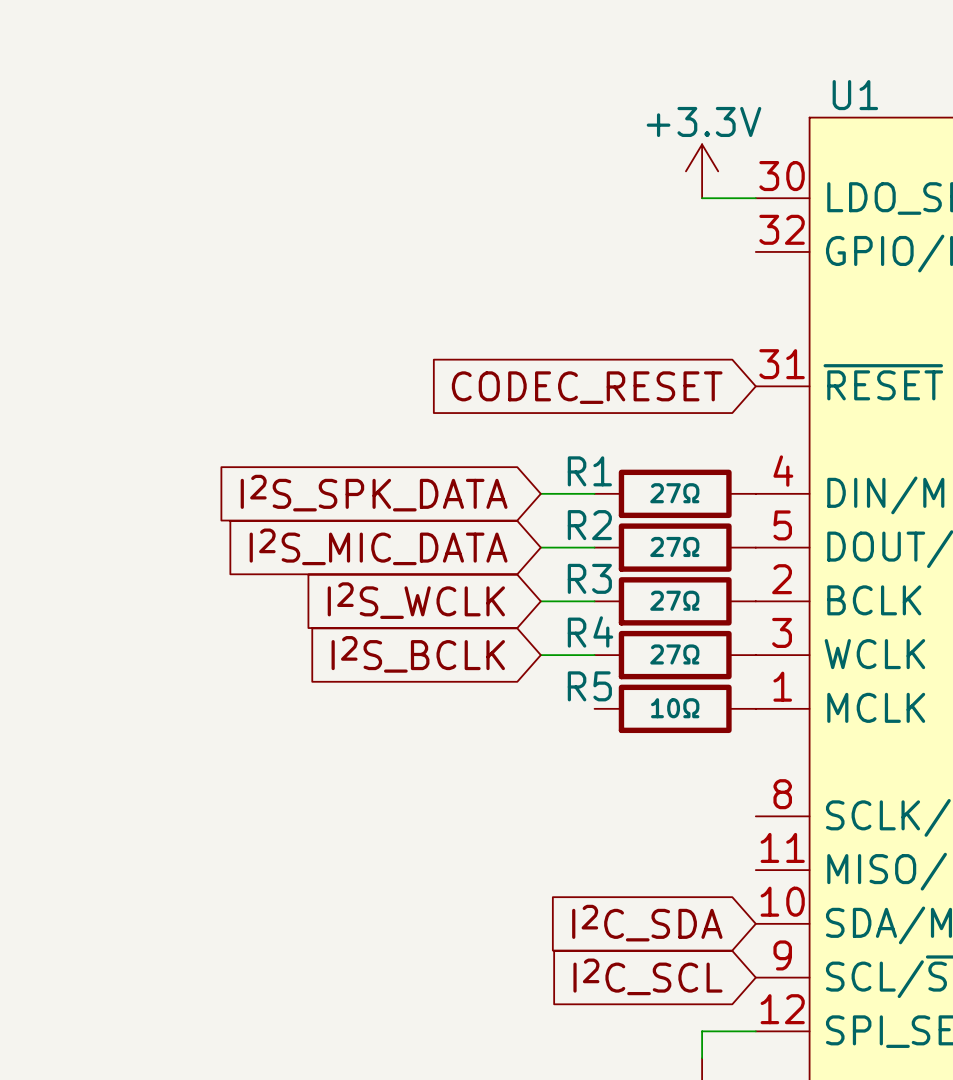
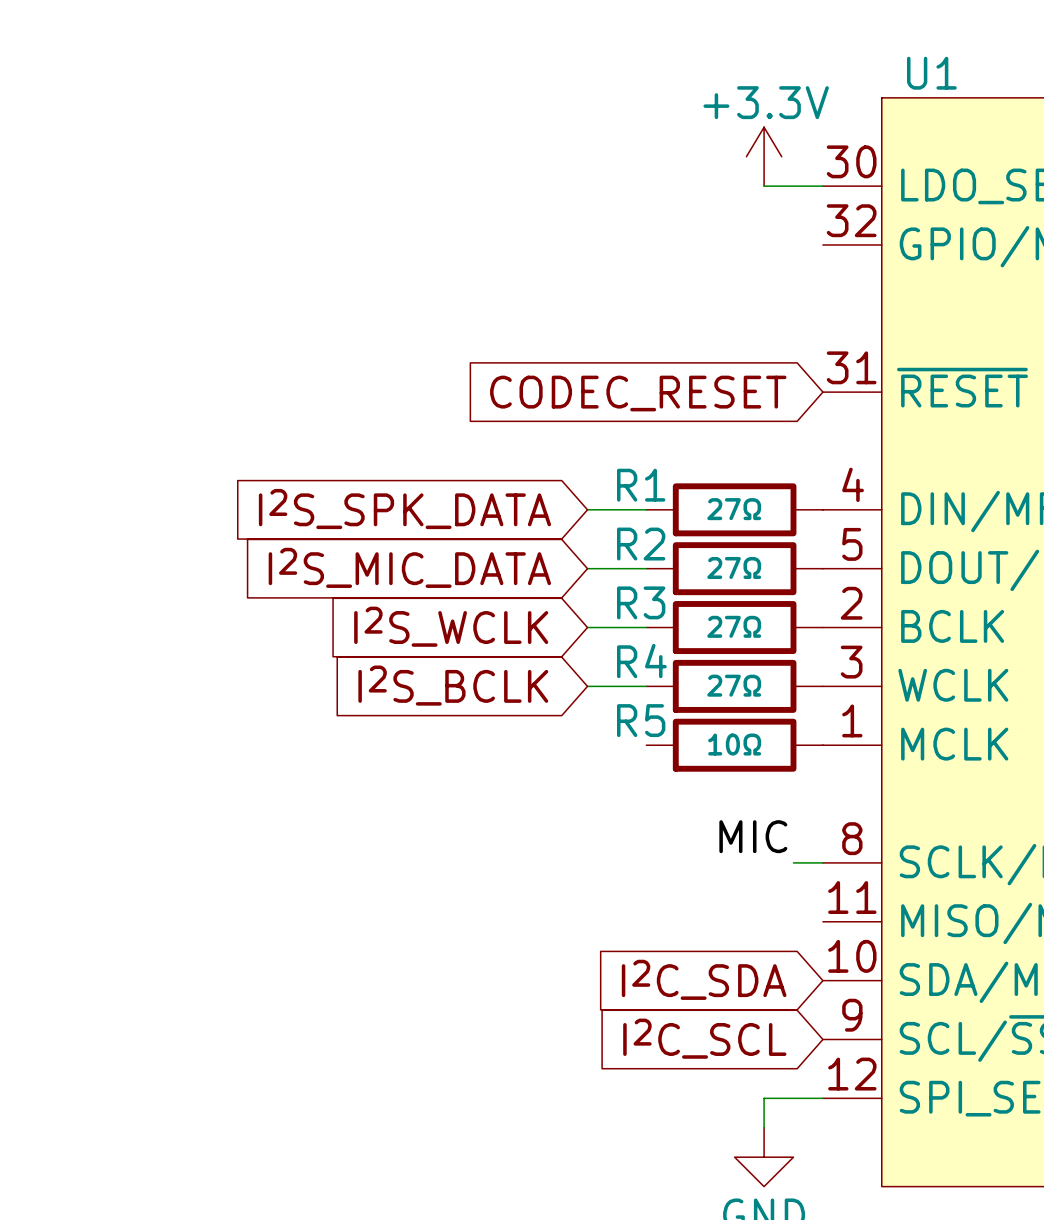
label: none -> MIC (753, 836)
wire: none -> (793, 862) (822, 862)

